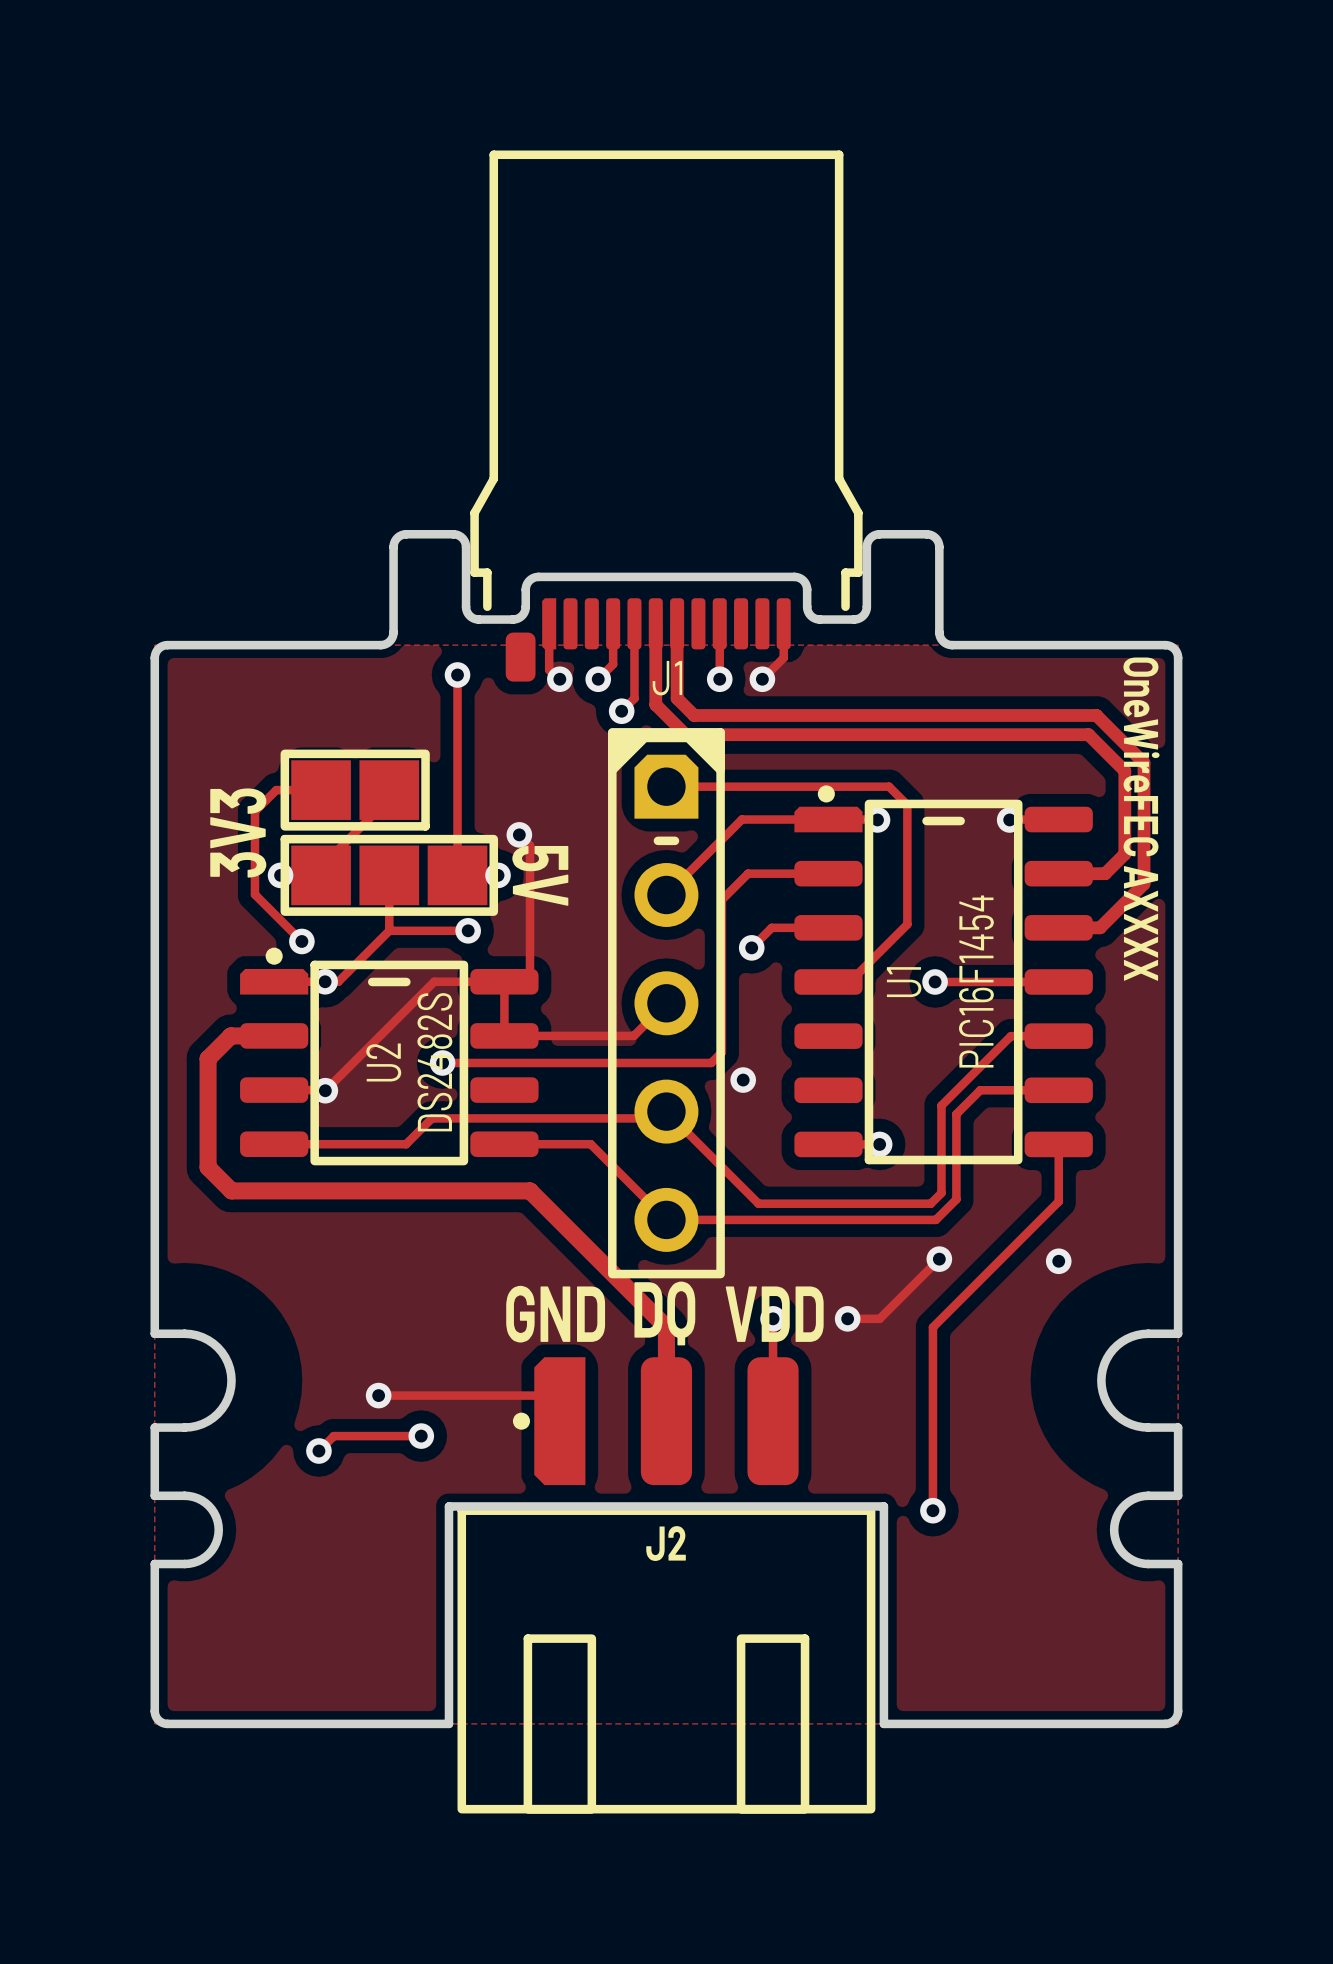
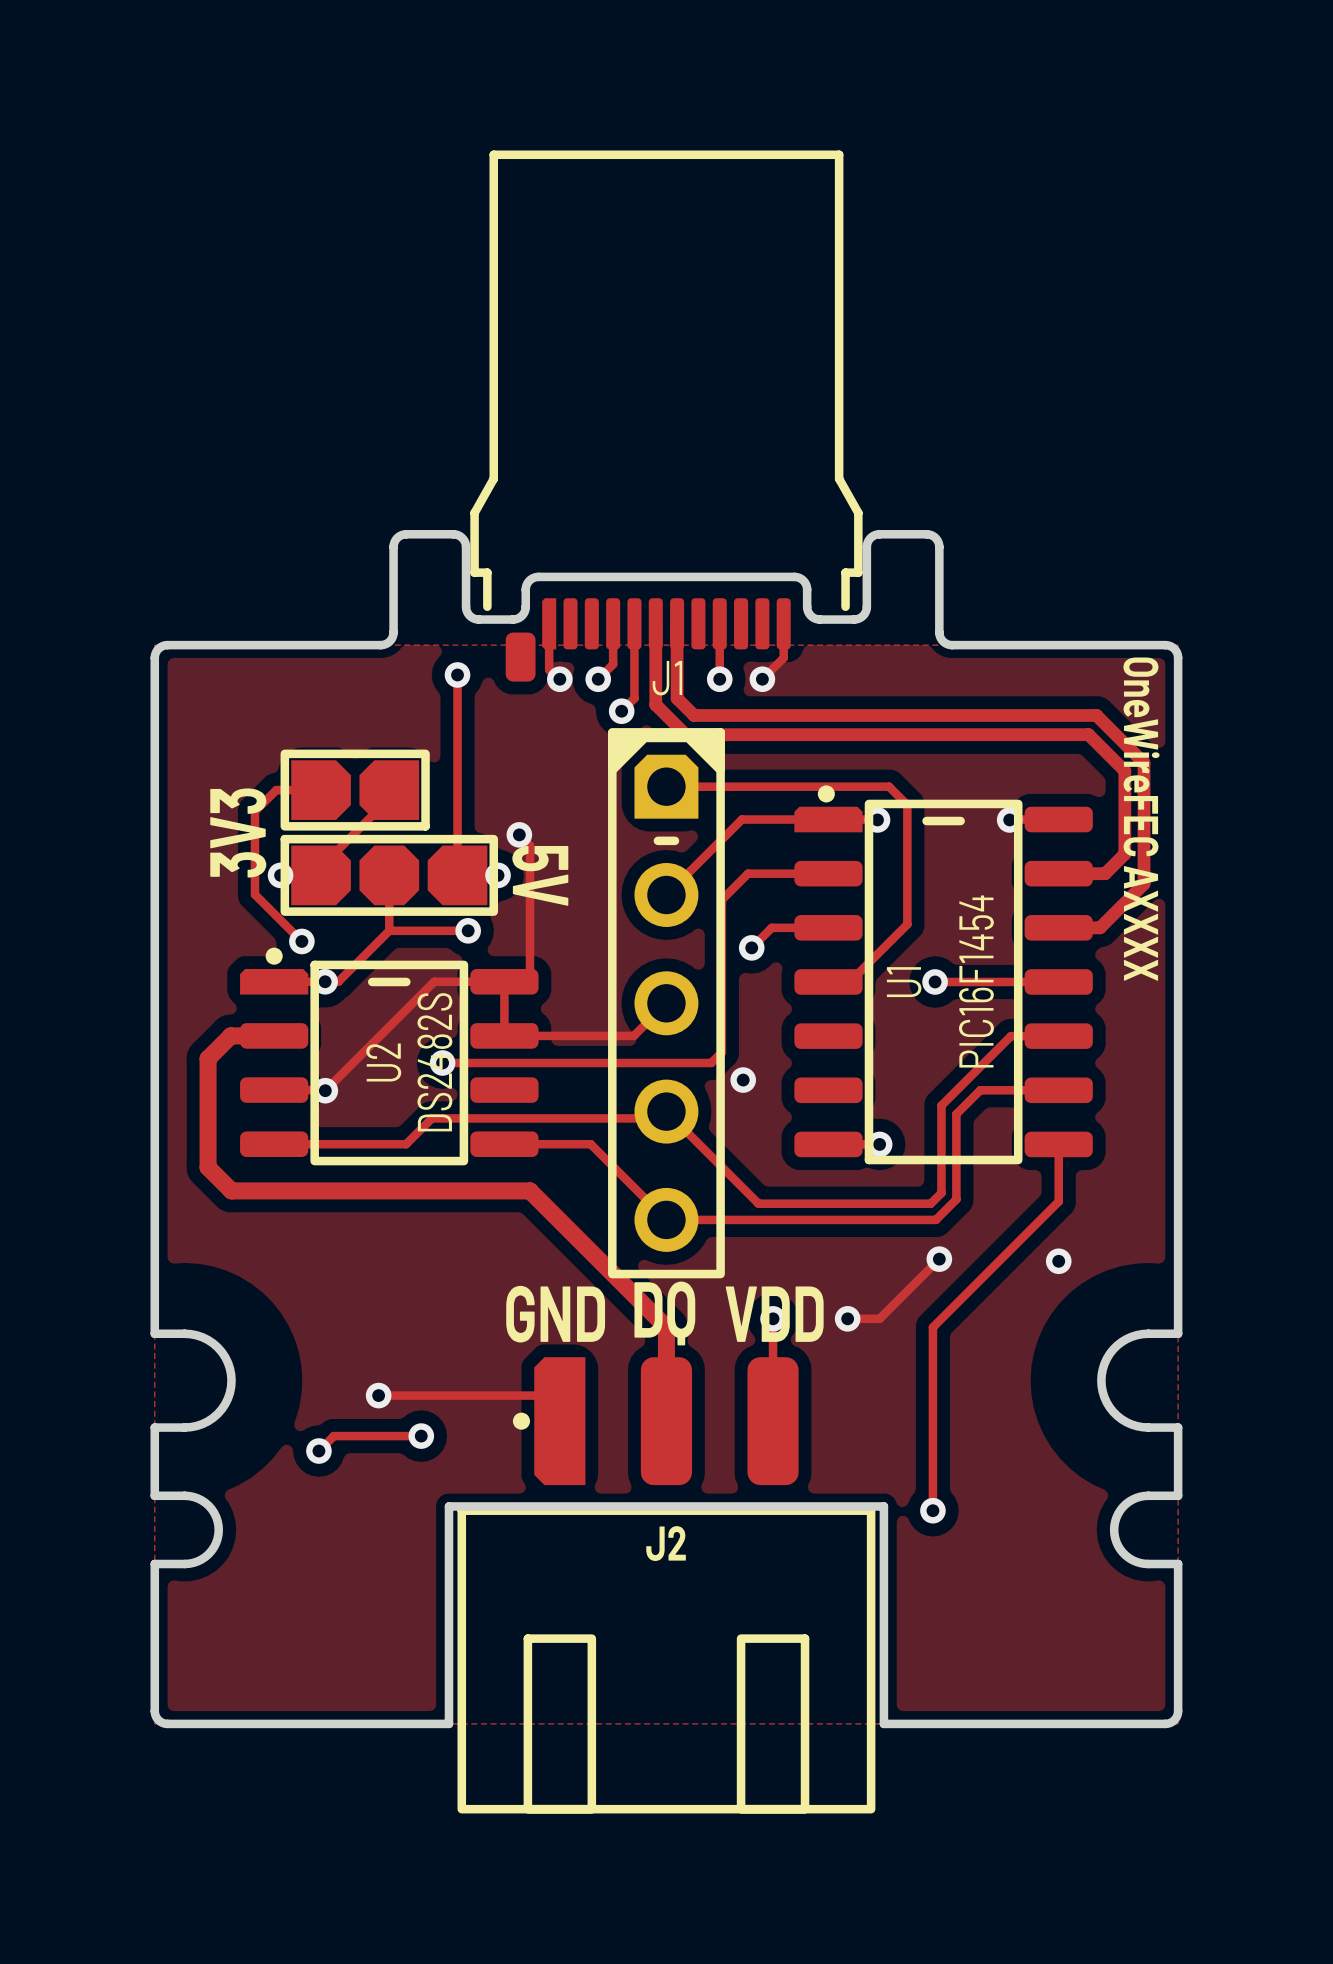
part footprint: [280, 749, 430, 831] -> [280, 749, 430, 831]
part footprint: [280, 834, 499, 916] -> [280, 834, 499, 916]

